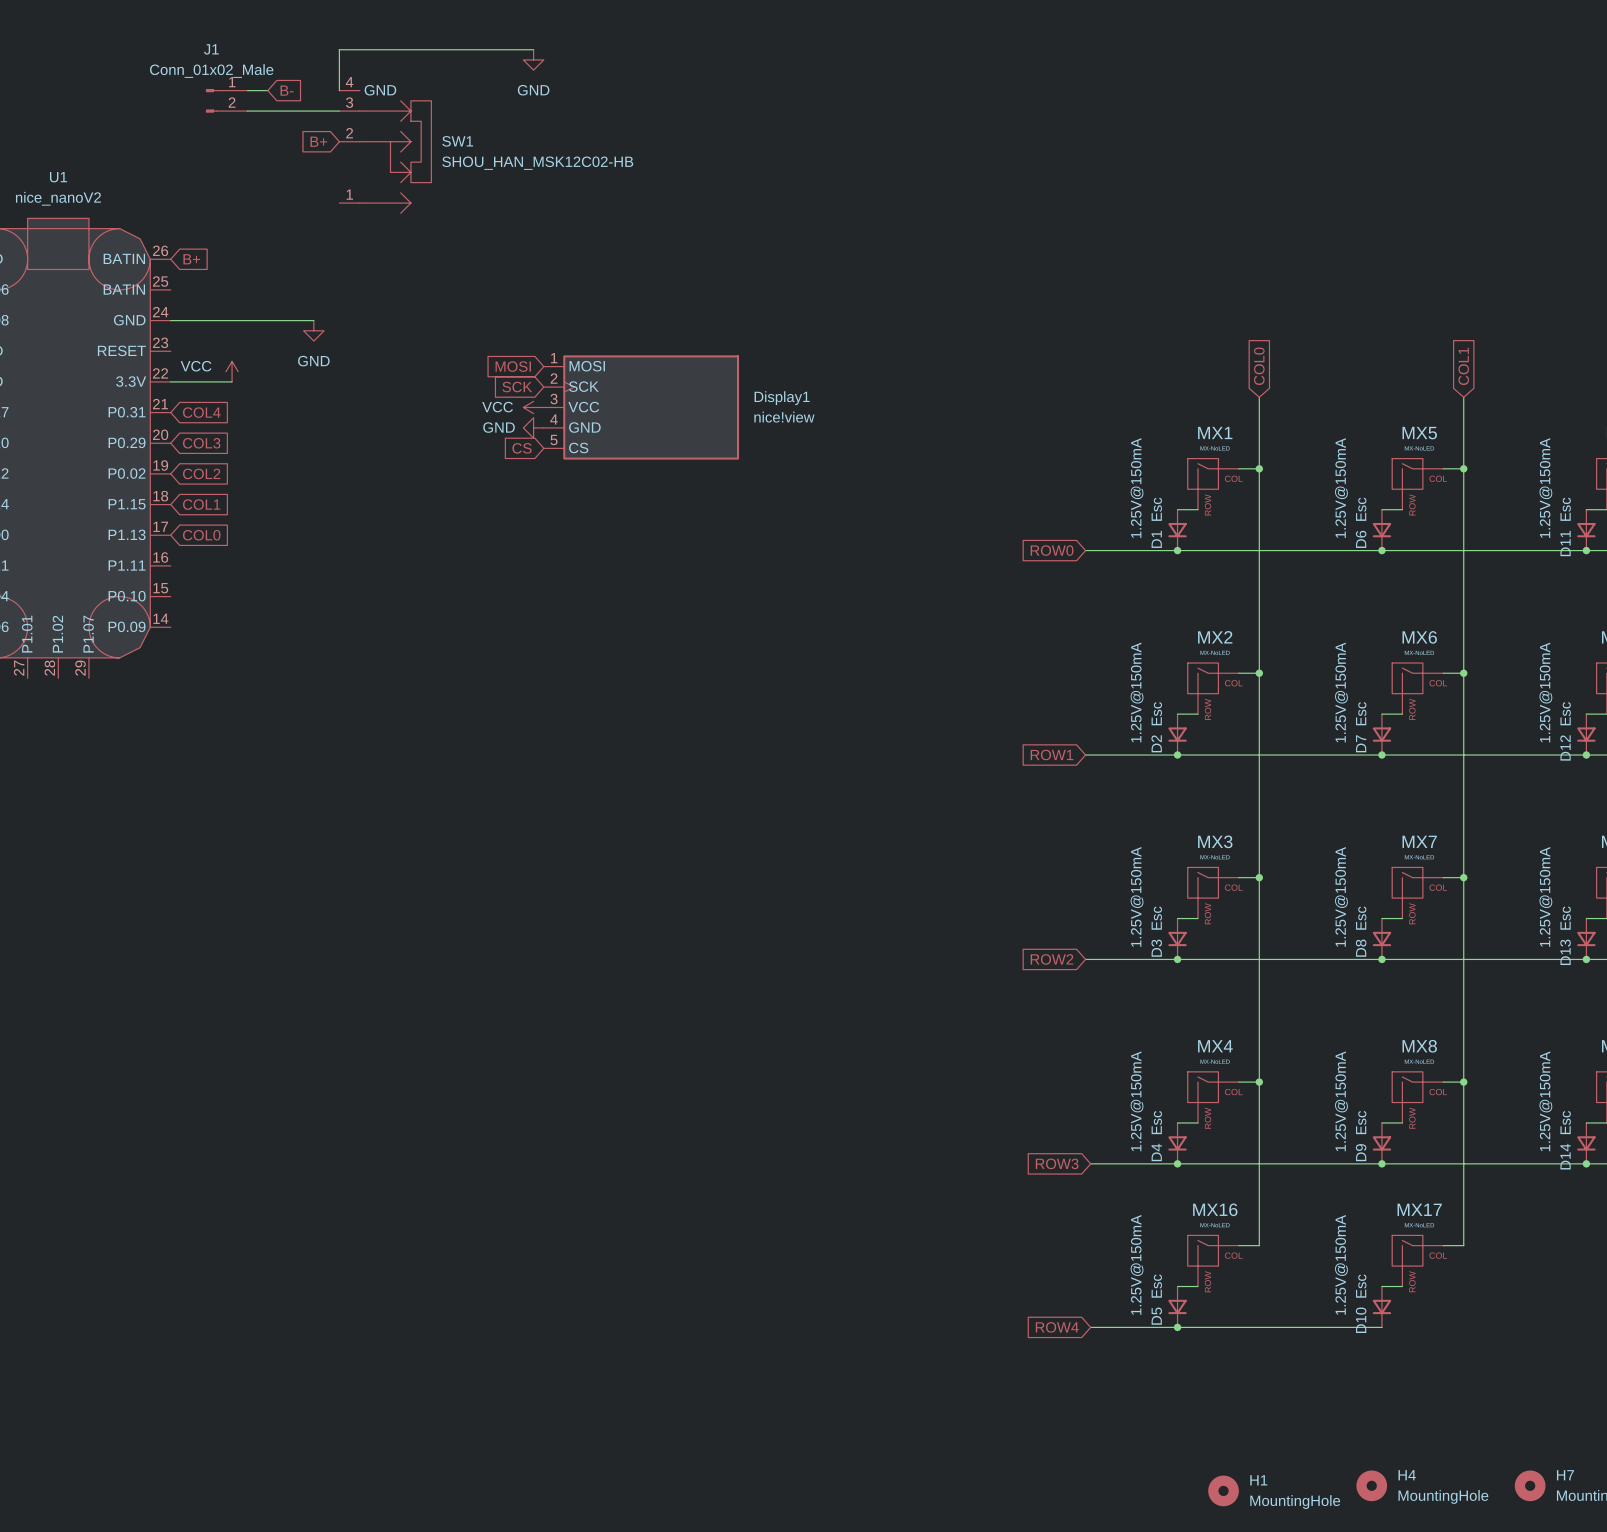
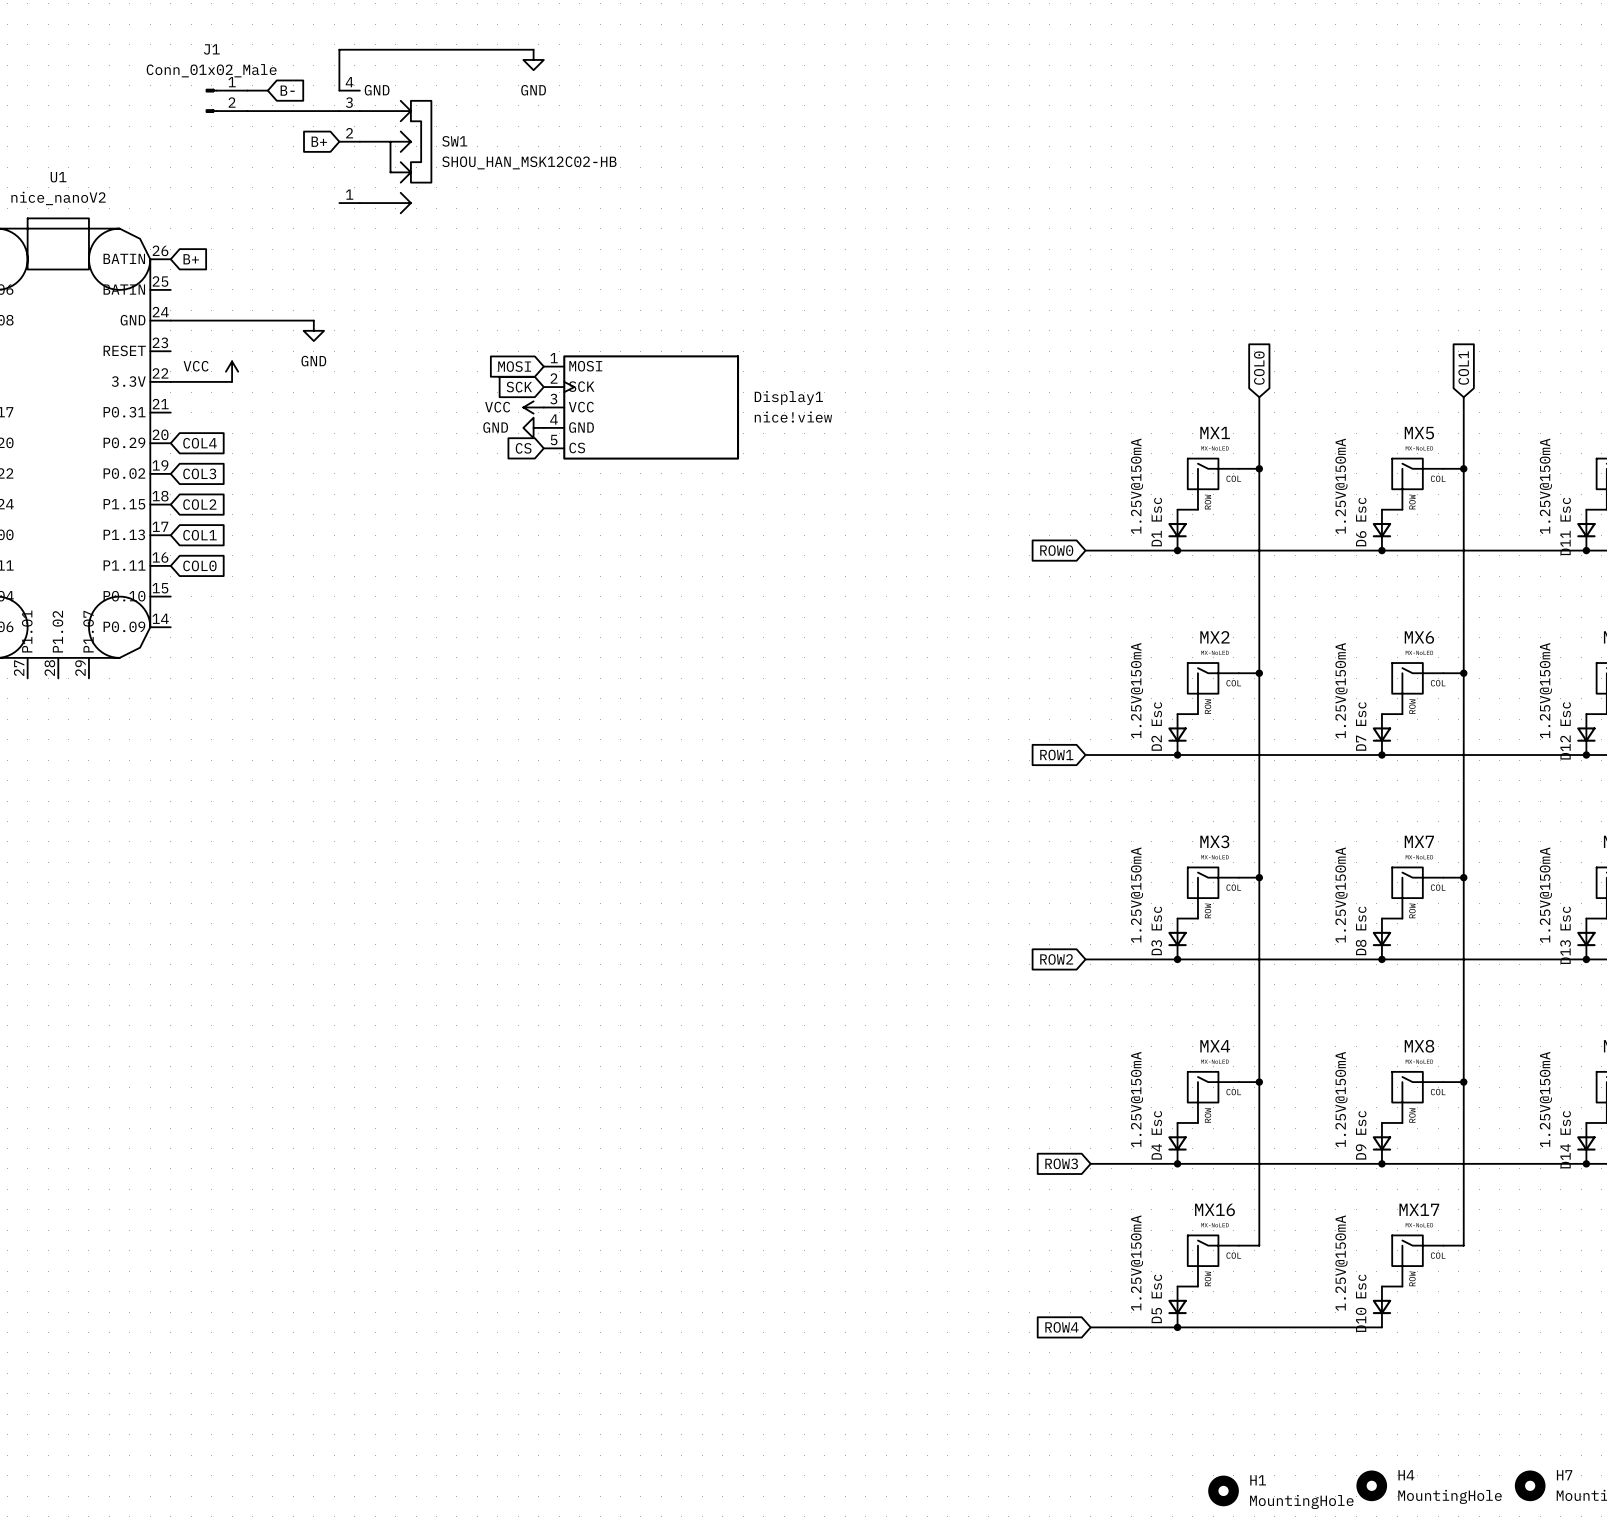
global label: COL4 (201, 412) -> none
global label: COL3 (201, 443) -> COL4 (200, 443)
global label: COL2 (201, 473) -> COL3 (199, 473)
global label: COL1 (201, 504) -> COL2 (199, 504)
global label: COL0 (201, 535) -> COL1 (199, 535)
global label: none -> COL0 (199, 565)

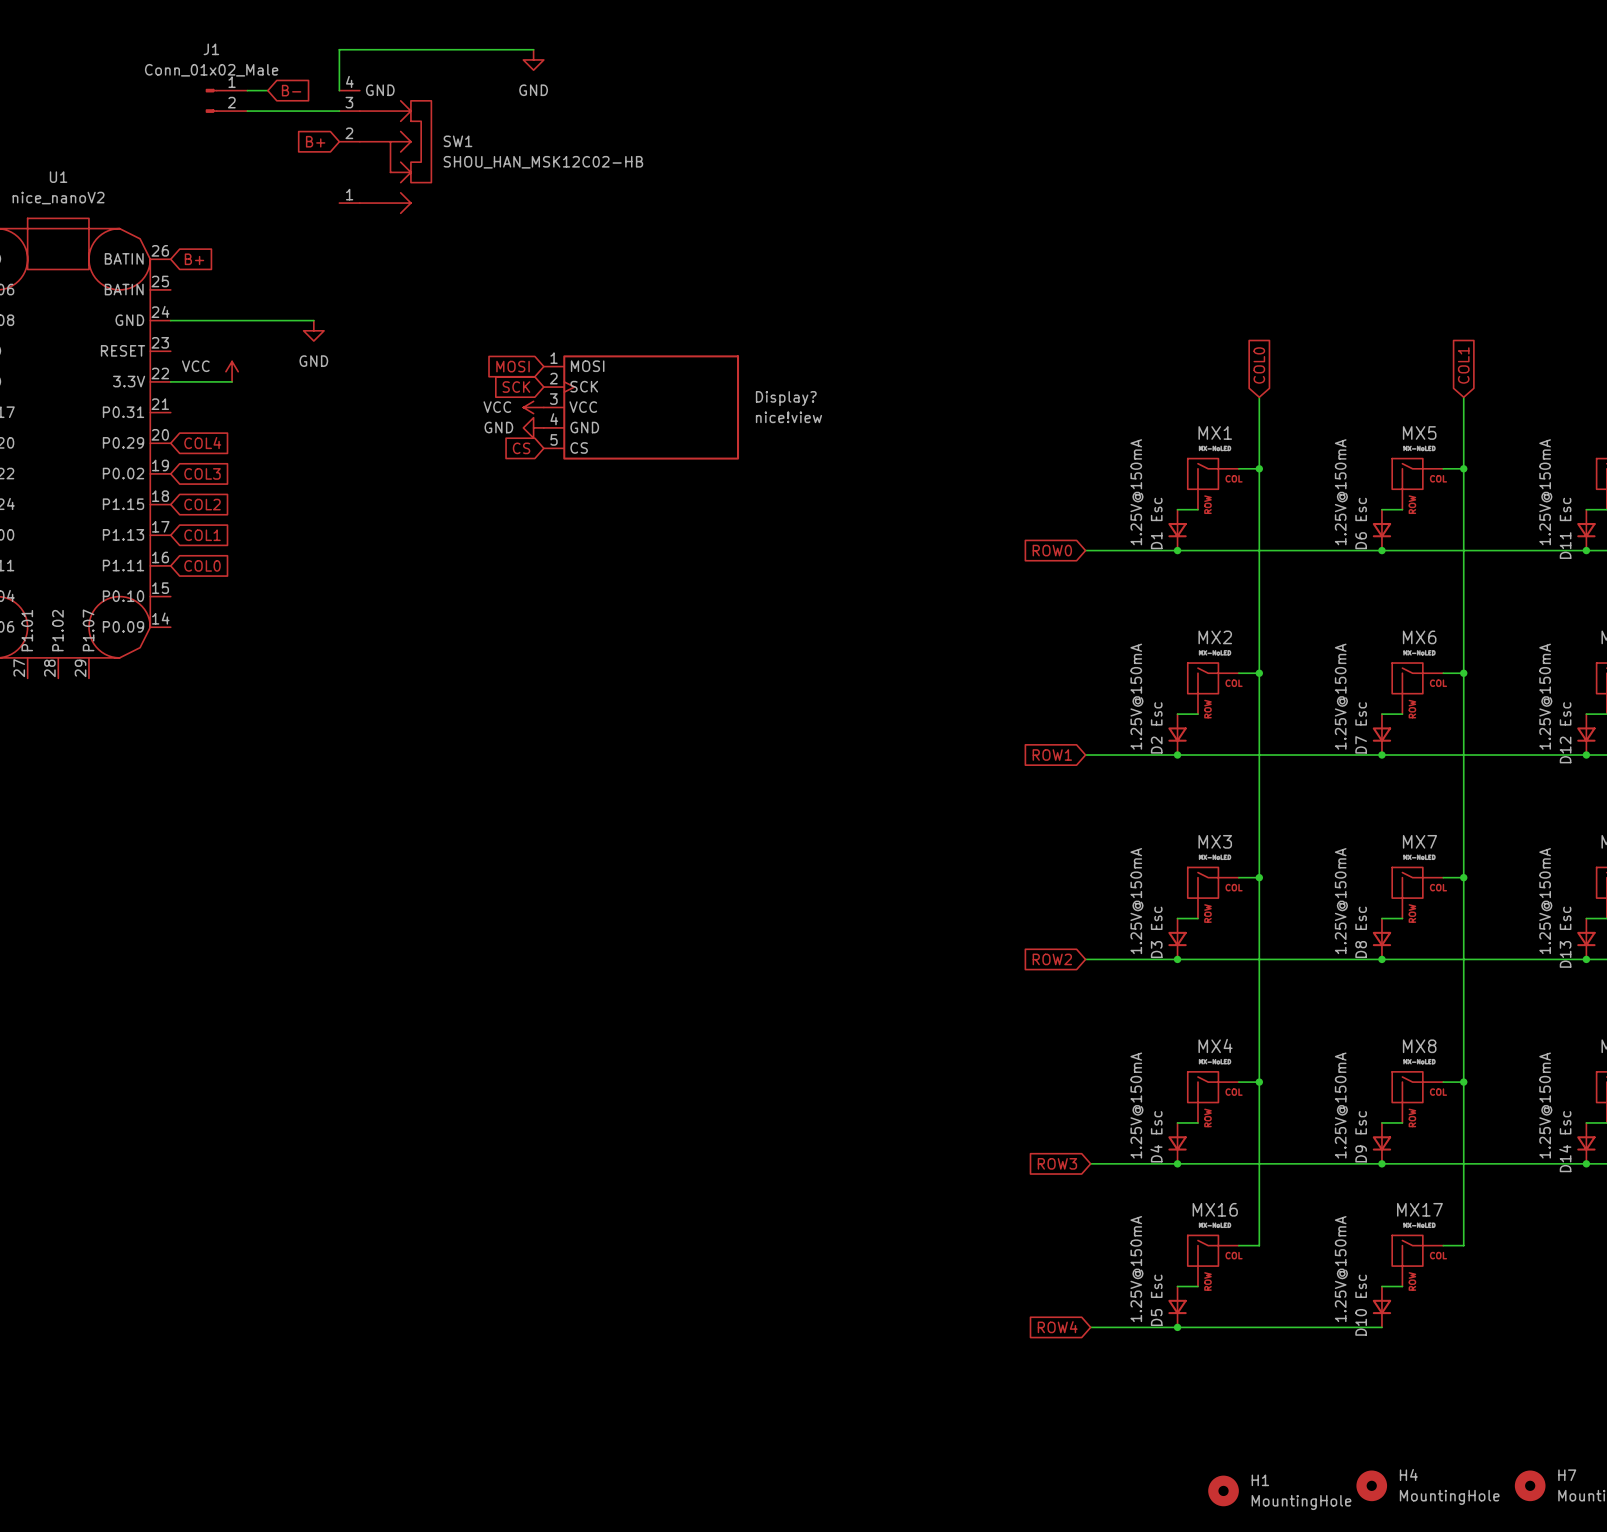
Display1 name: Display1 (788, 397) -> Display? (786, 398)

